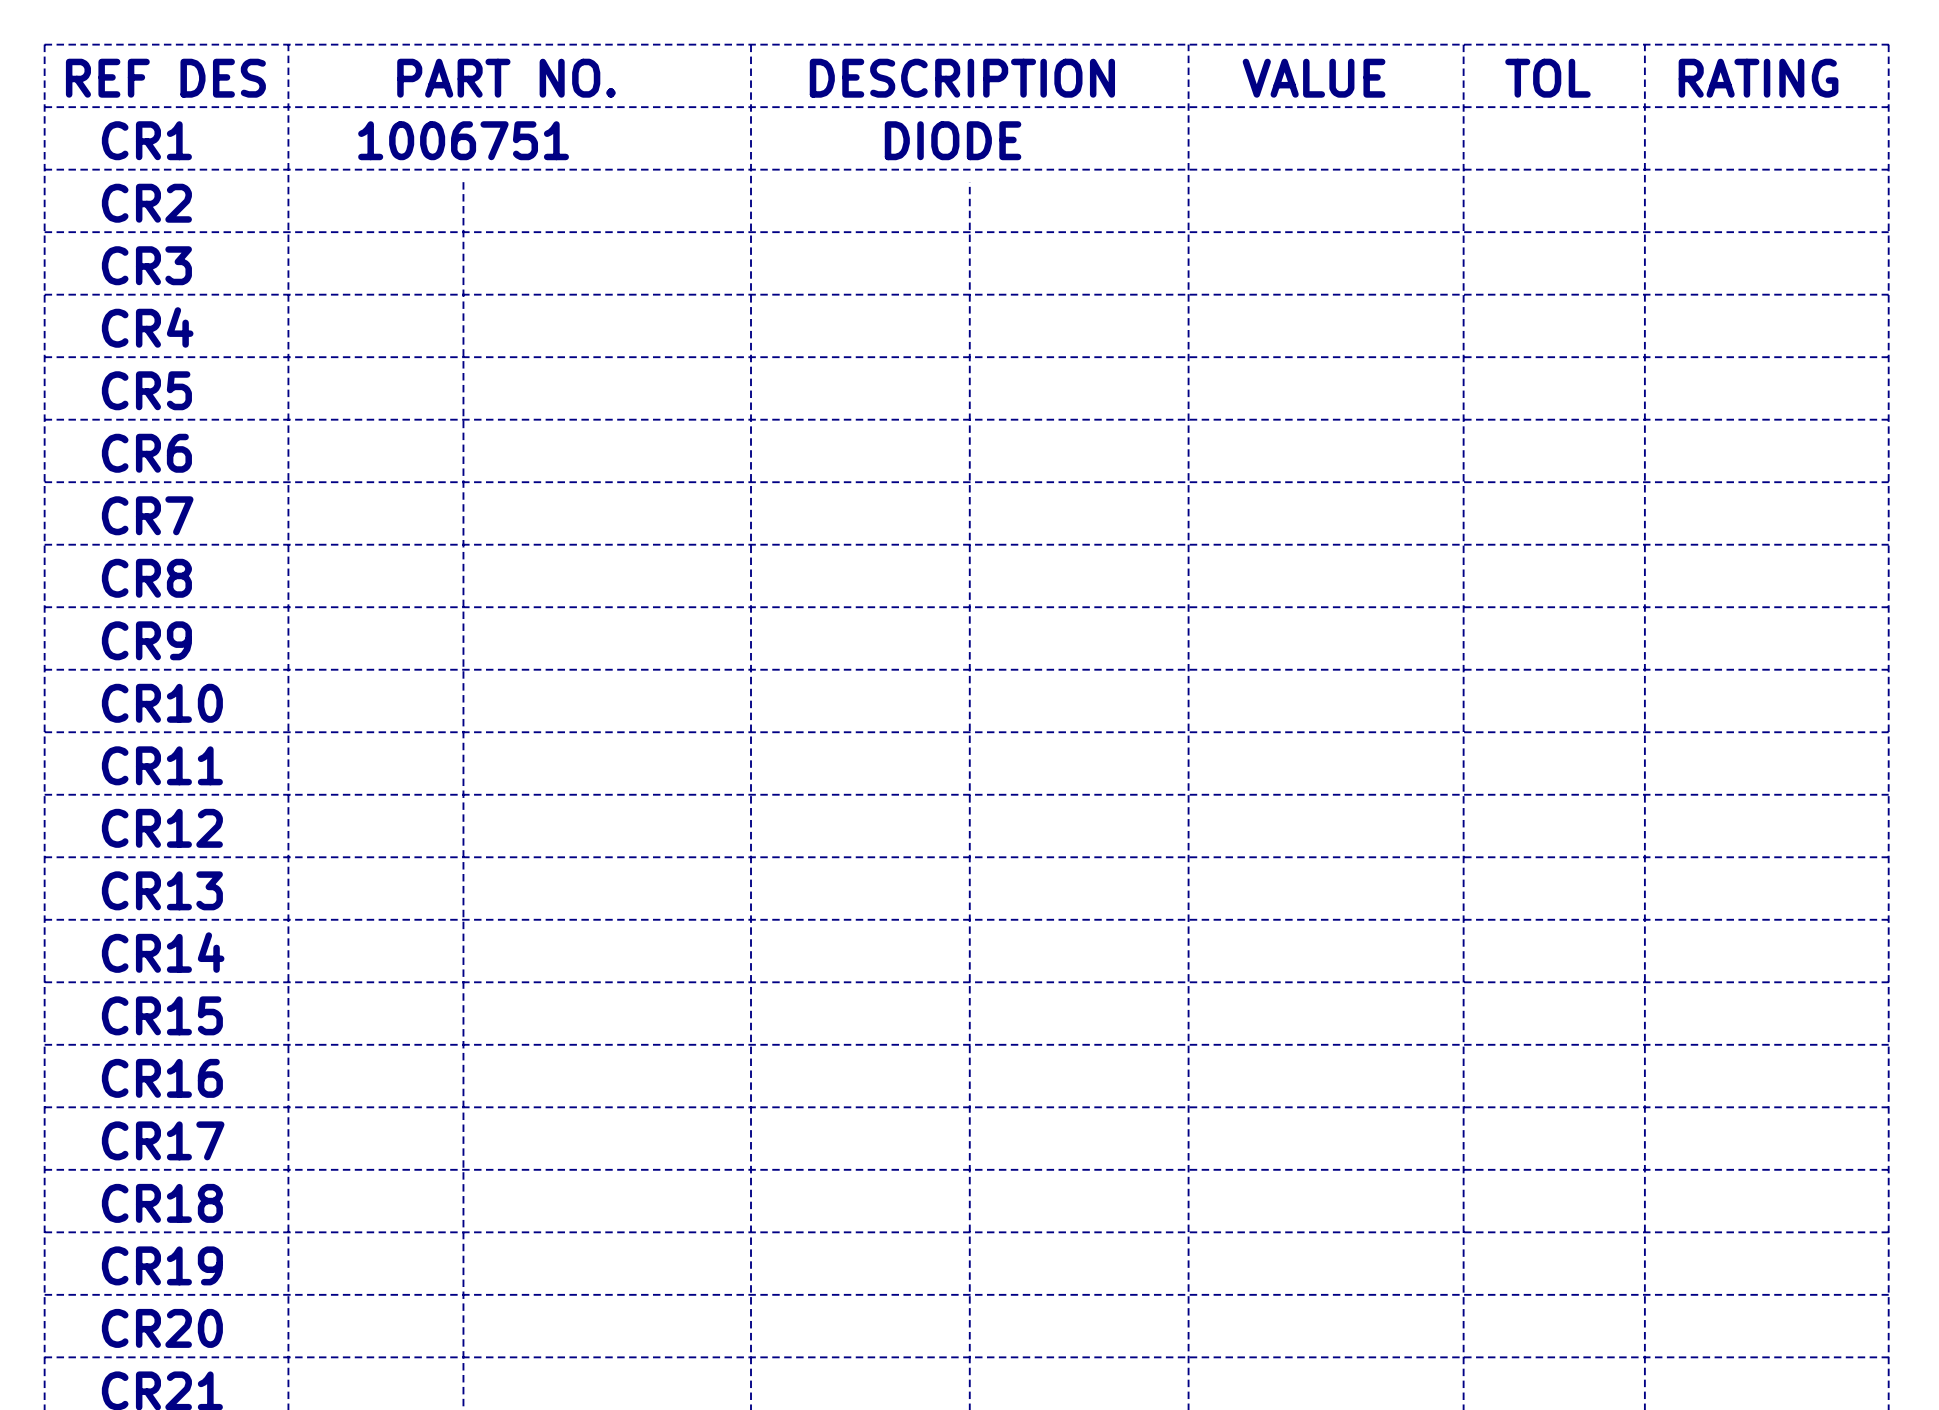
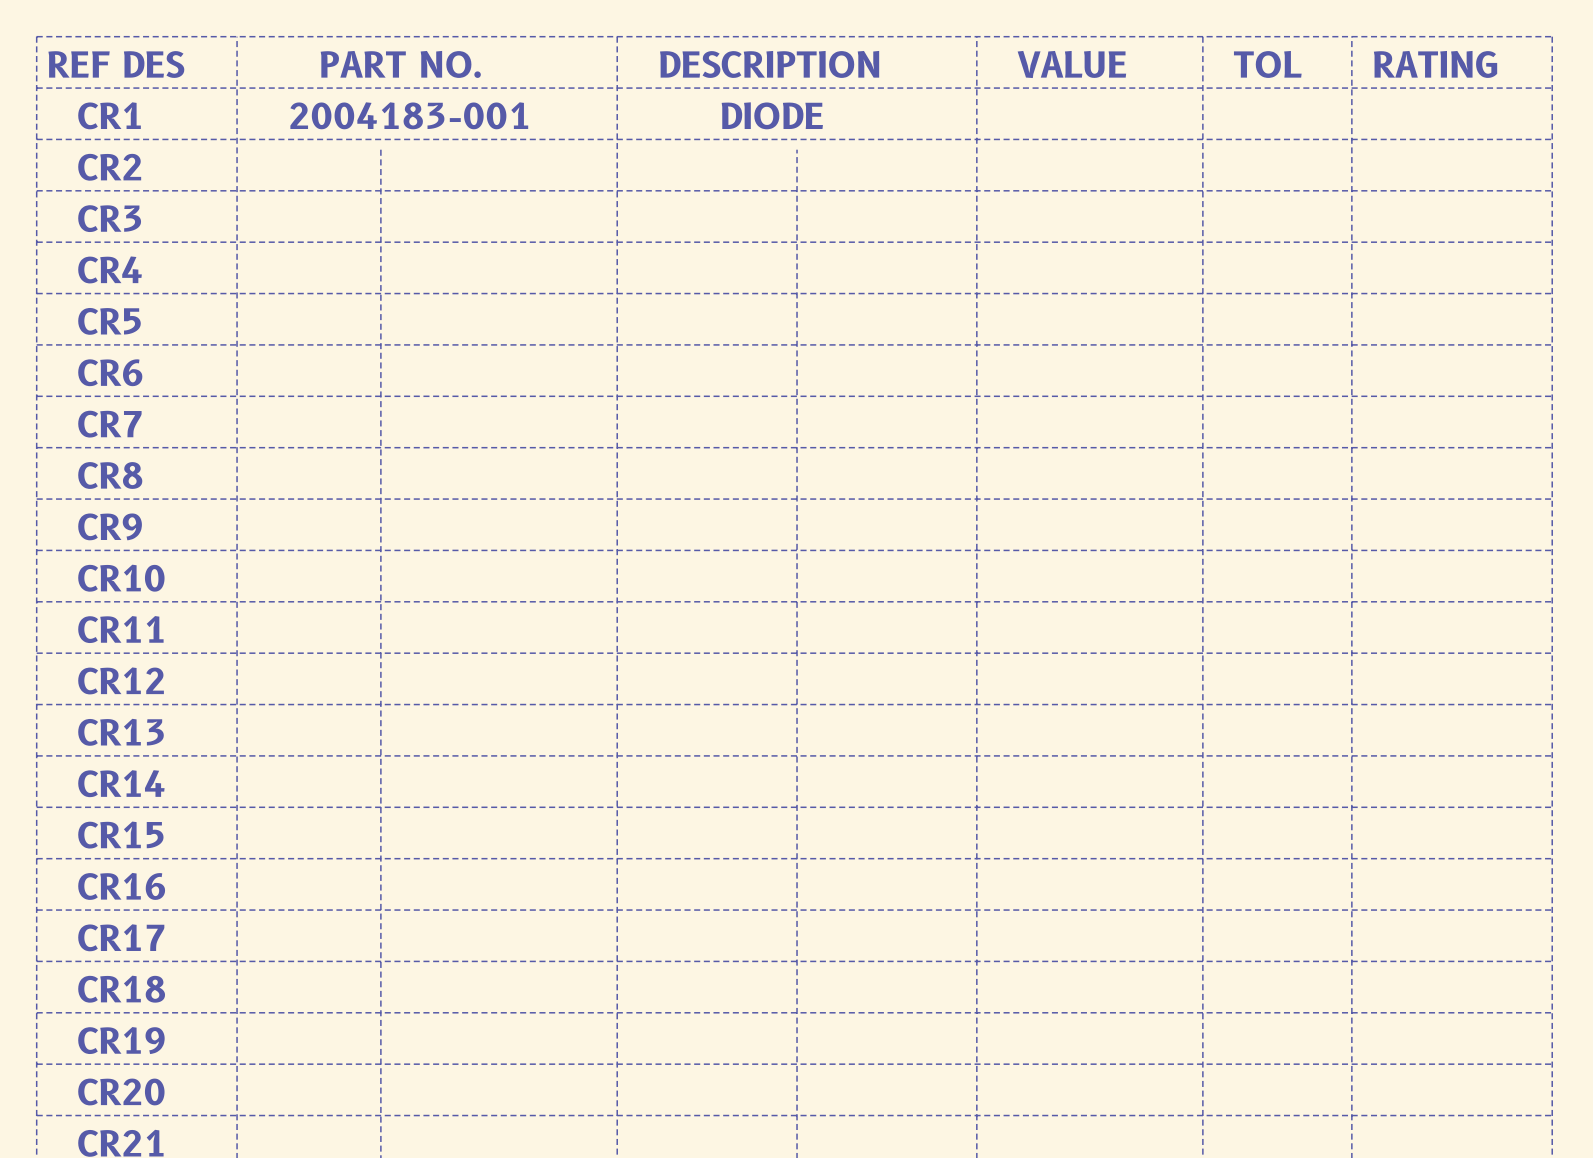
text: 1006751 (463, 140) -> 2004183-001 (409, 115)

